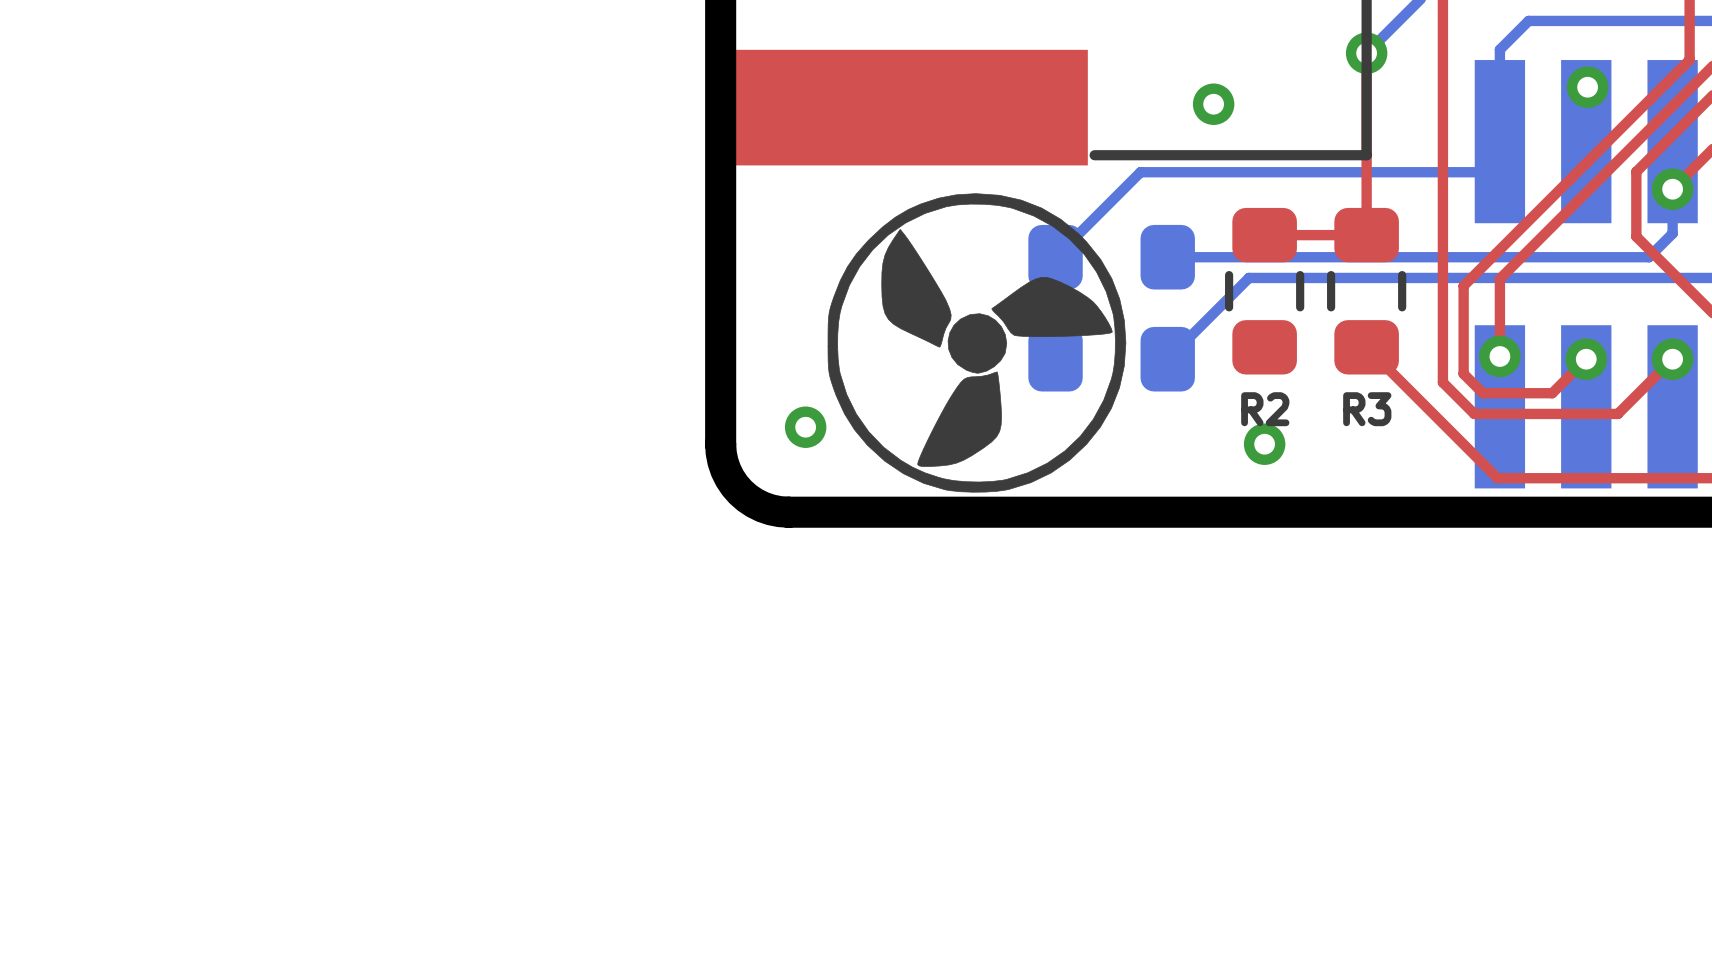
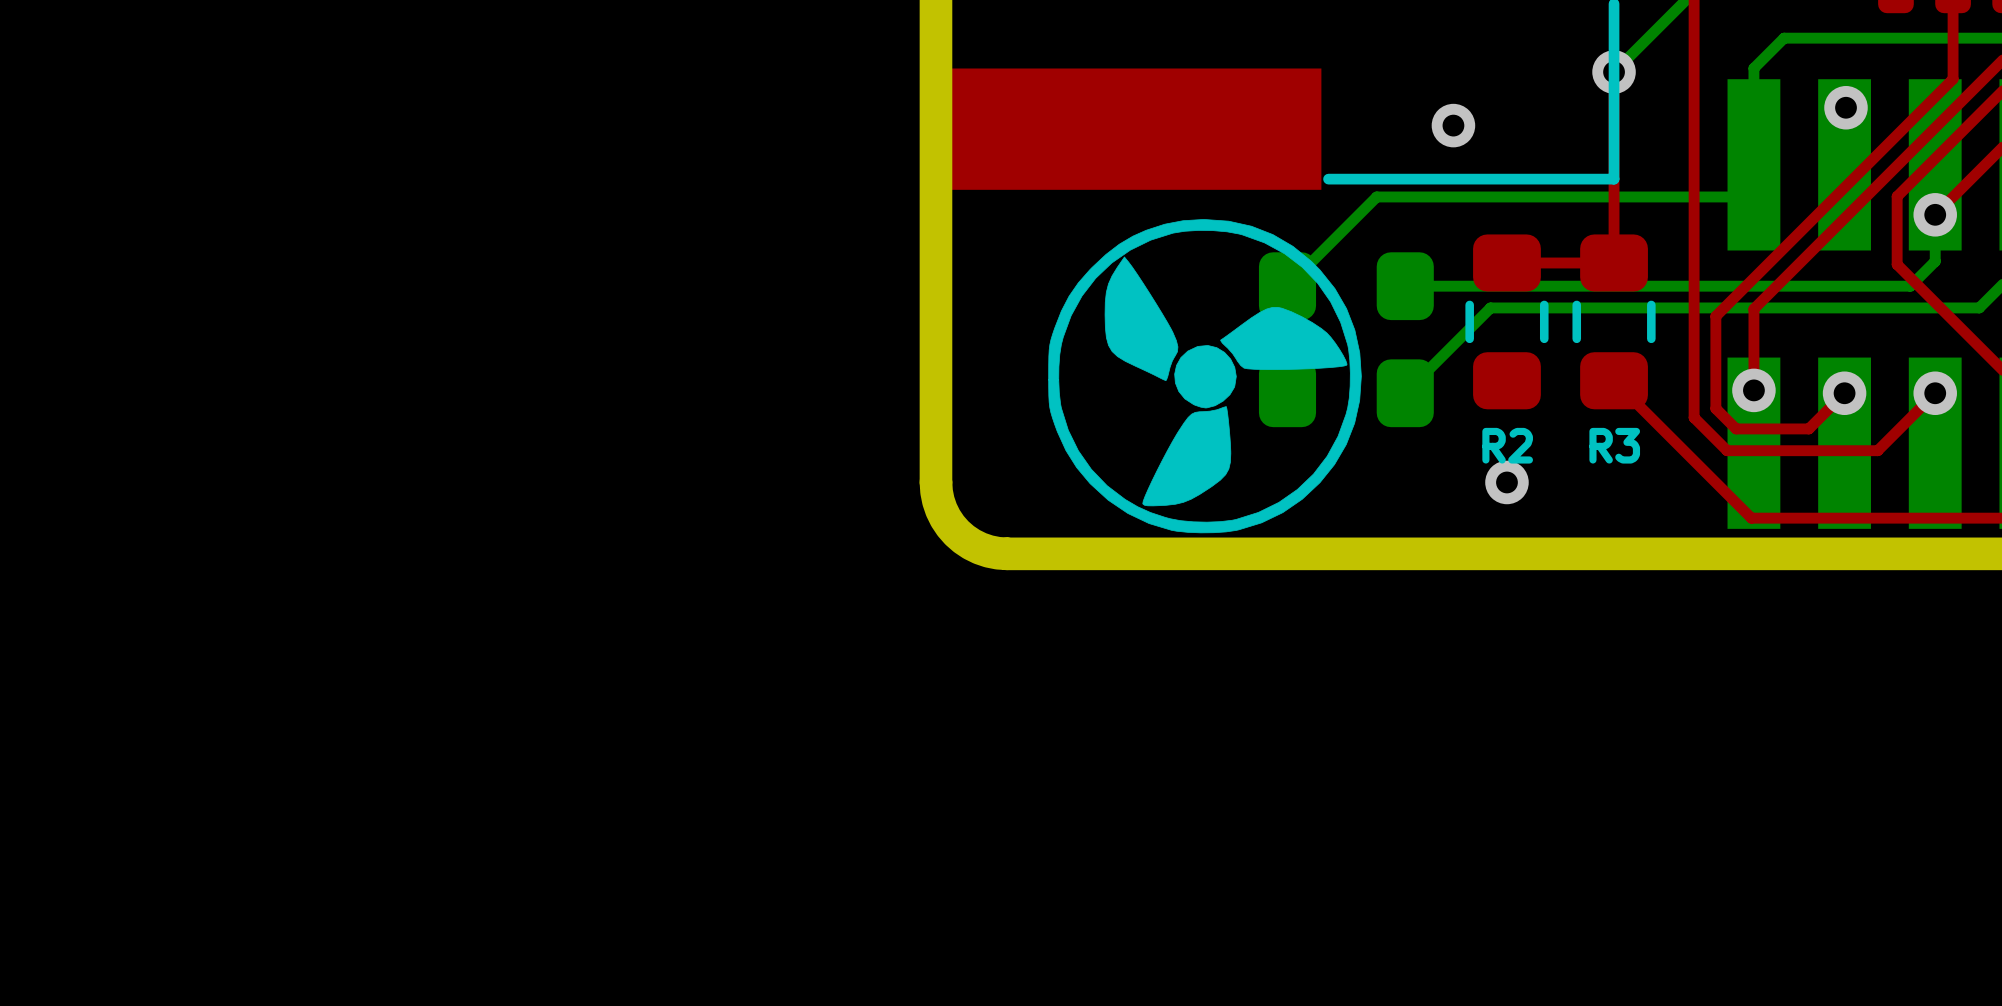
via: (805, 427) -> none

